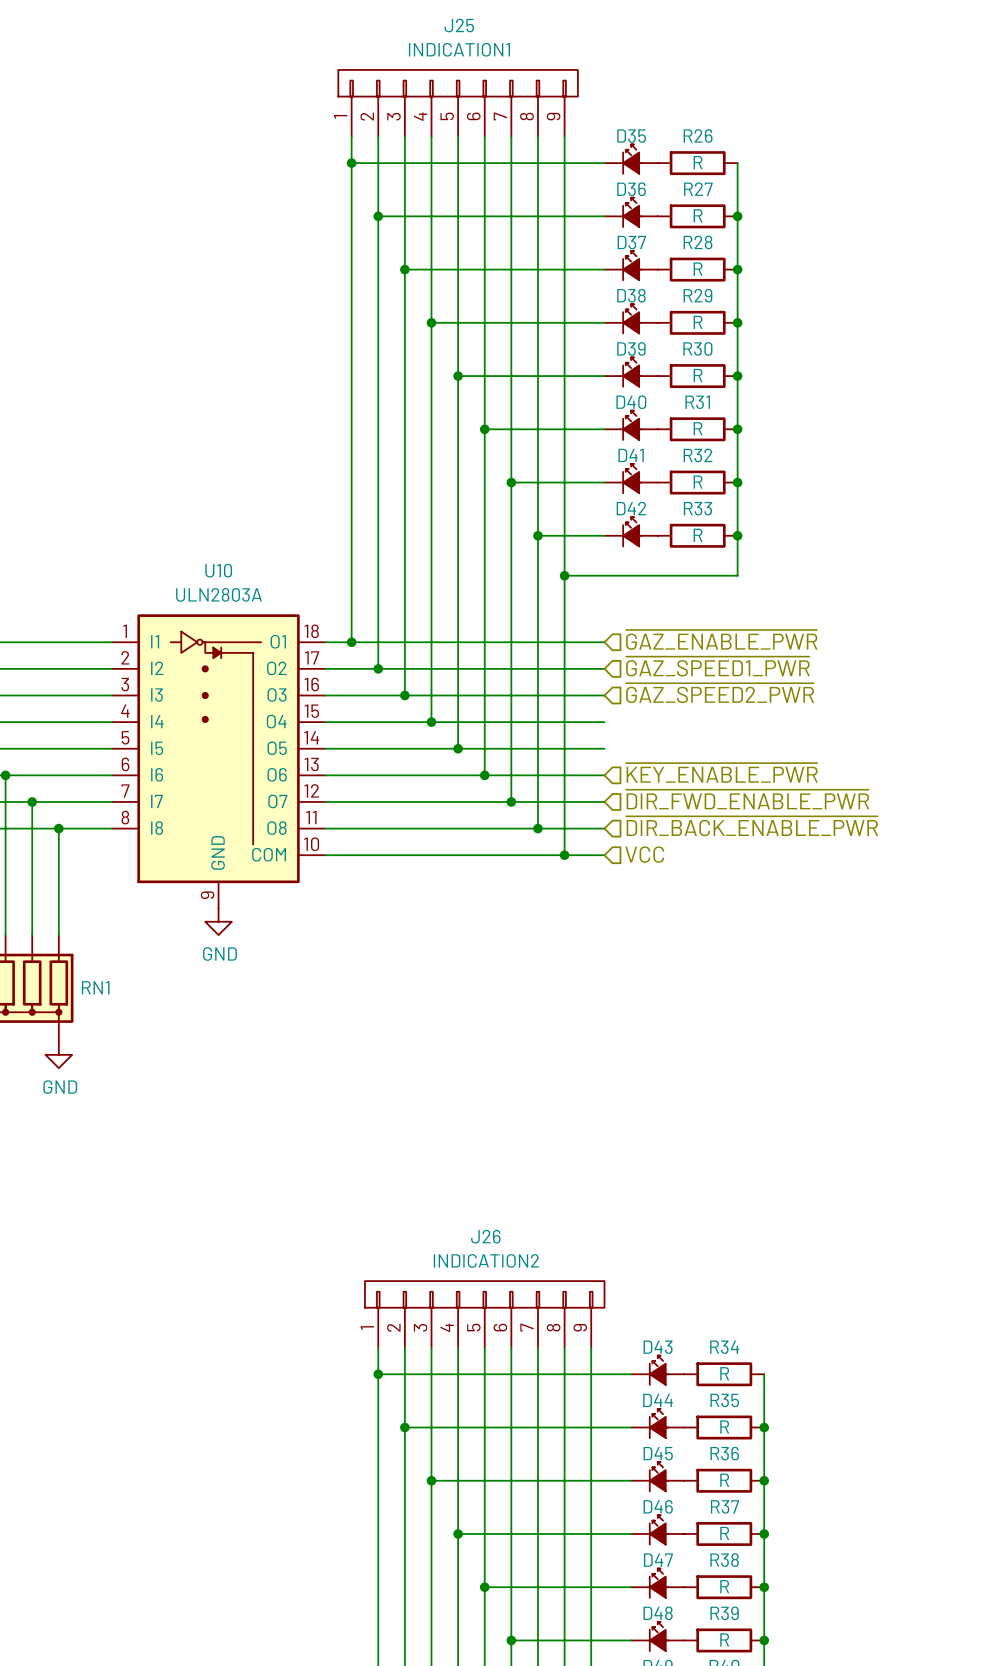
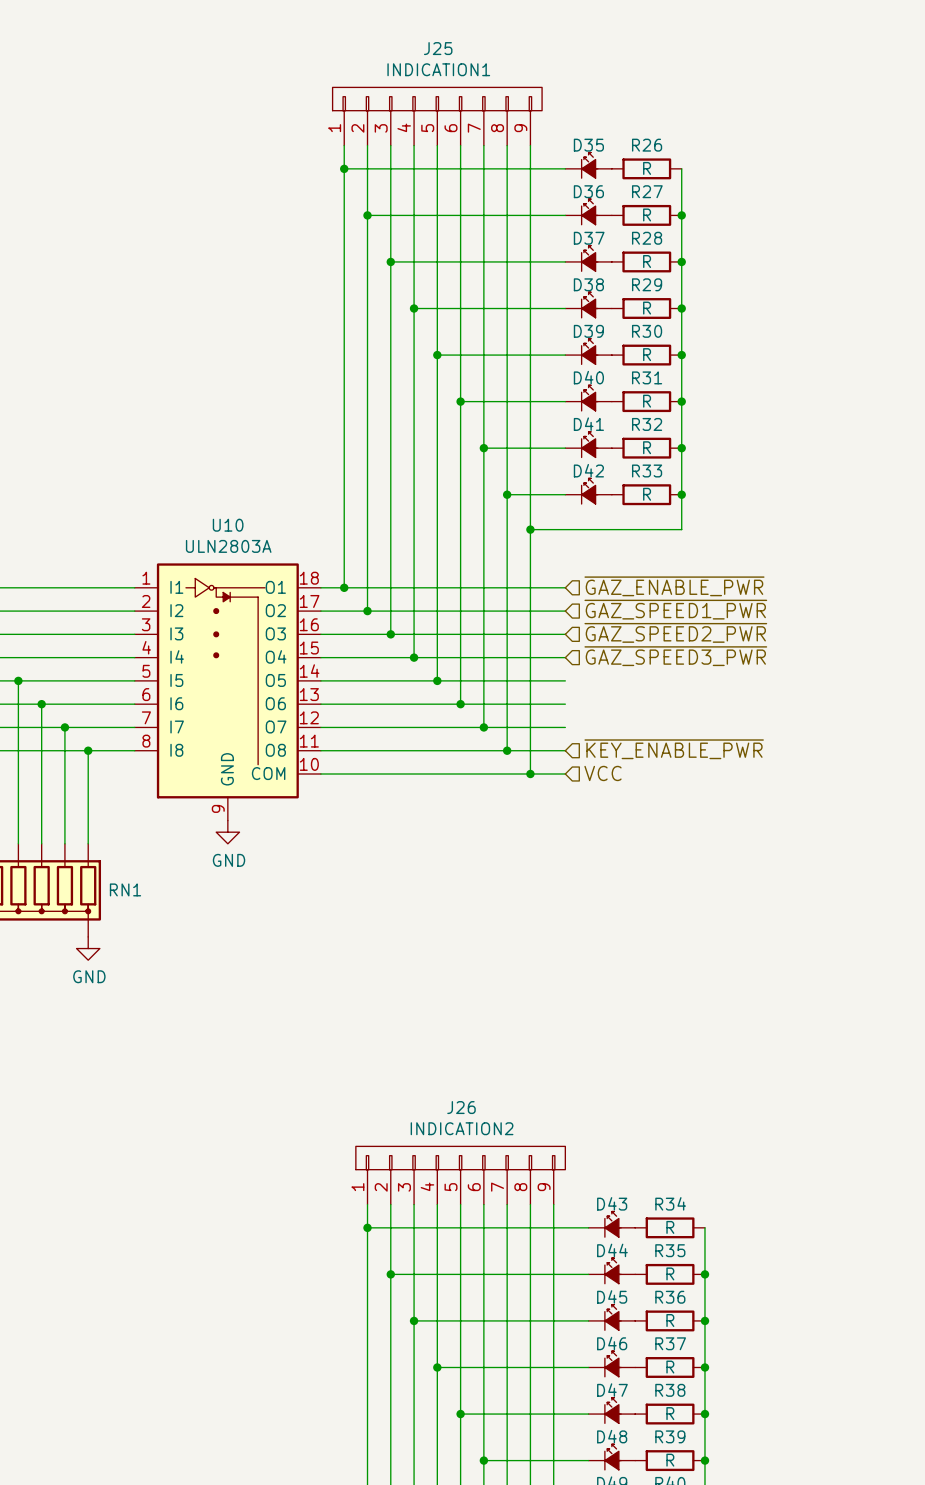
hierarchical label: none -> ~{GAZ_SPEED3_PWR} (675, 656)
hierarchical label: ~{KEY_ENABLE_PWR} (721, 772) -> none
hierarchical label: ~{DIR_FWD_ENABLE_PWR} (747, 799) -> none
hierarchical label: ~{DIR_BACK_ENABLE_PWR} (752, 826) -> ~{KEY_ENABLE_PWR} (674, 749)

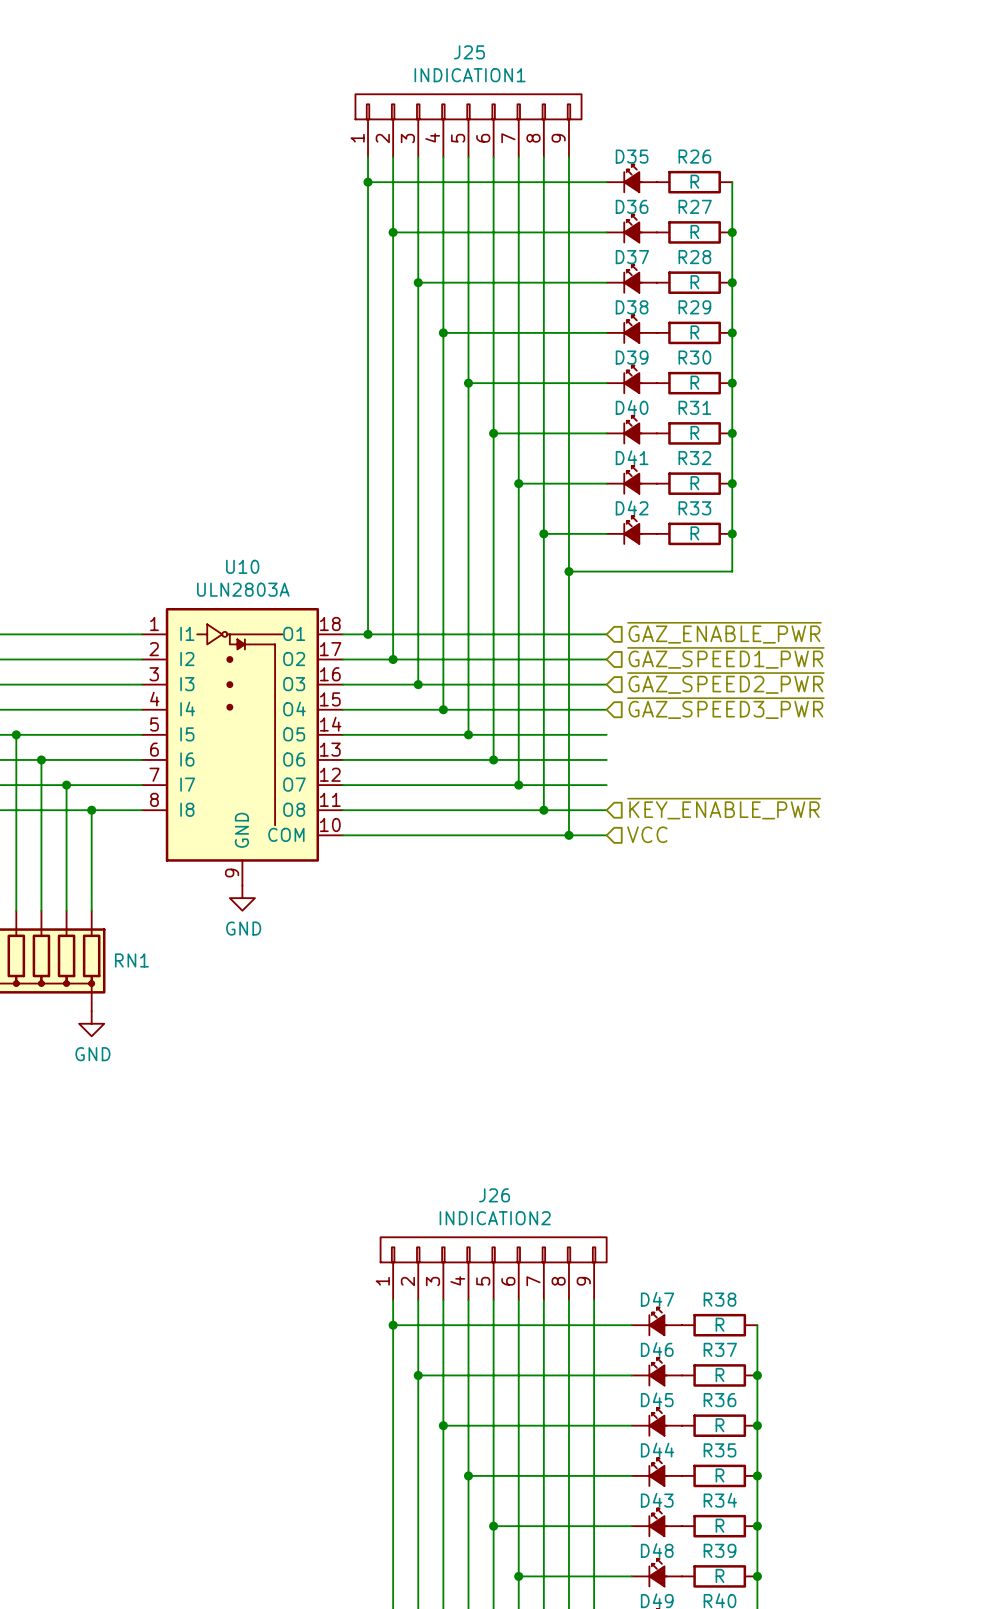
D43 name: D43 (612, 1203) -> D47 (657, 1299)
R34 name: R34 (670, 1203) -> R38 (720, 1299)
D44 name: D44 (612, 1250) -> D46 (657, 1349)
R35 name: R35 (670, 1250) -> R37 (720, 1349)
D46 name: D46 (612, 1343) -> D44 (657, 1450)
R37 name: R37 (670, 1343) -> R35 (720, 1450)
D47 name: D47 (612, 1390) -> D43 (657, 1500)
R38 name: R38 (670, 1390) -> R34 (720, 1500)

